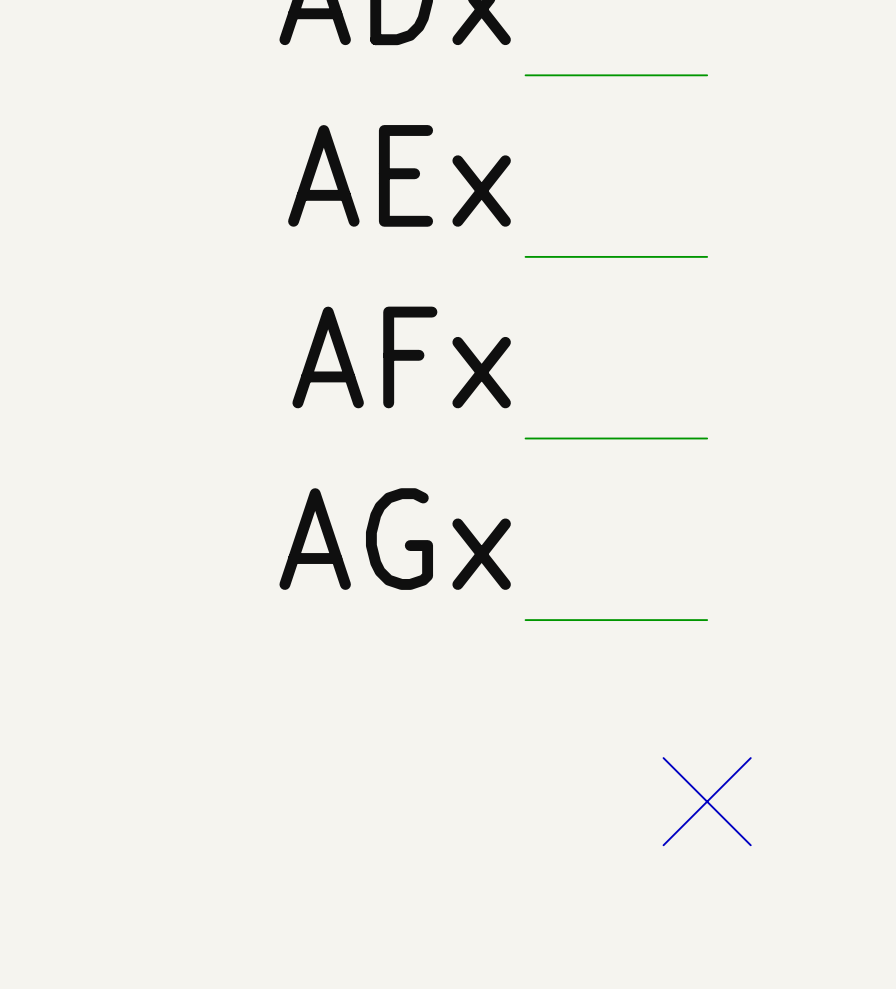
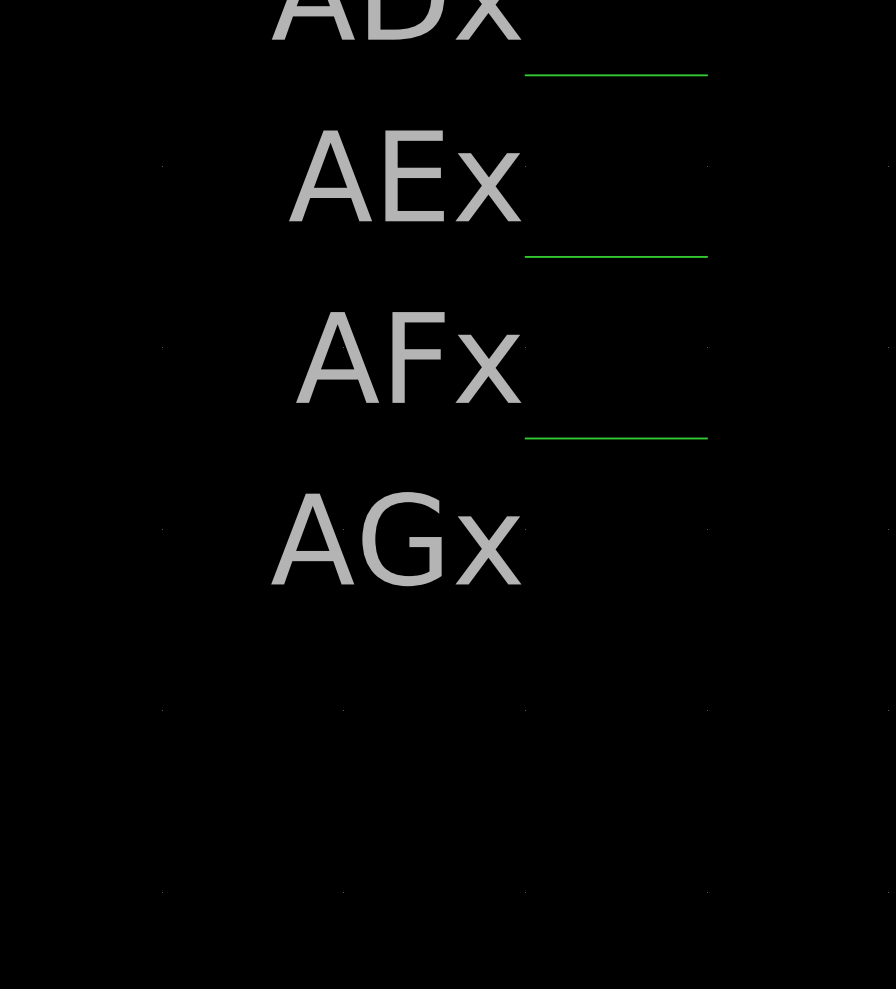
wire: (525, 620) (707, 620) -> none
no-connect mark: (707, 801) -> none

